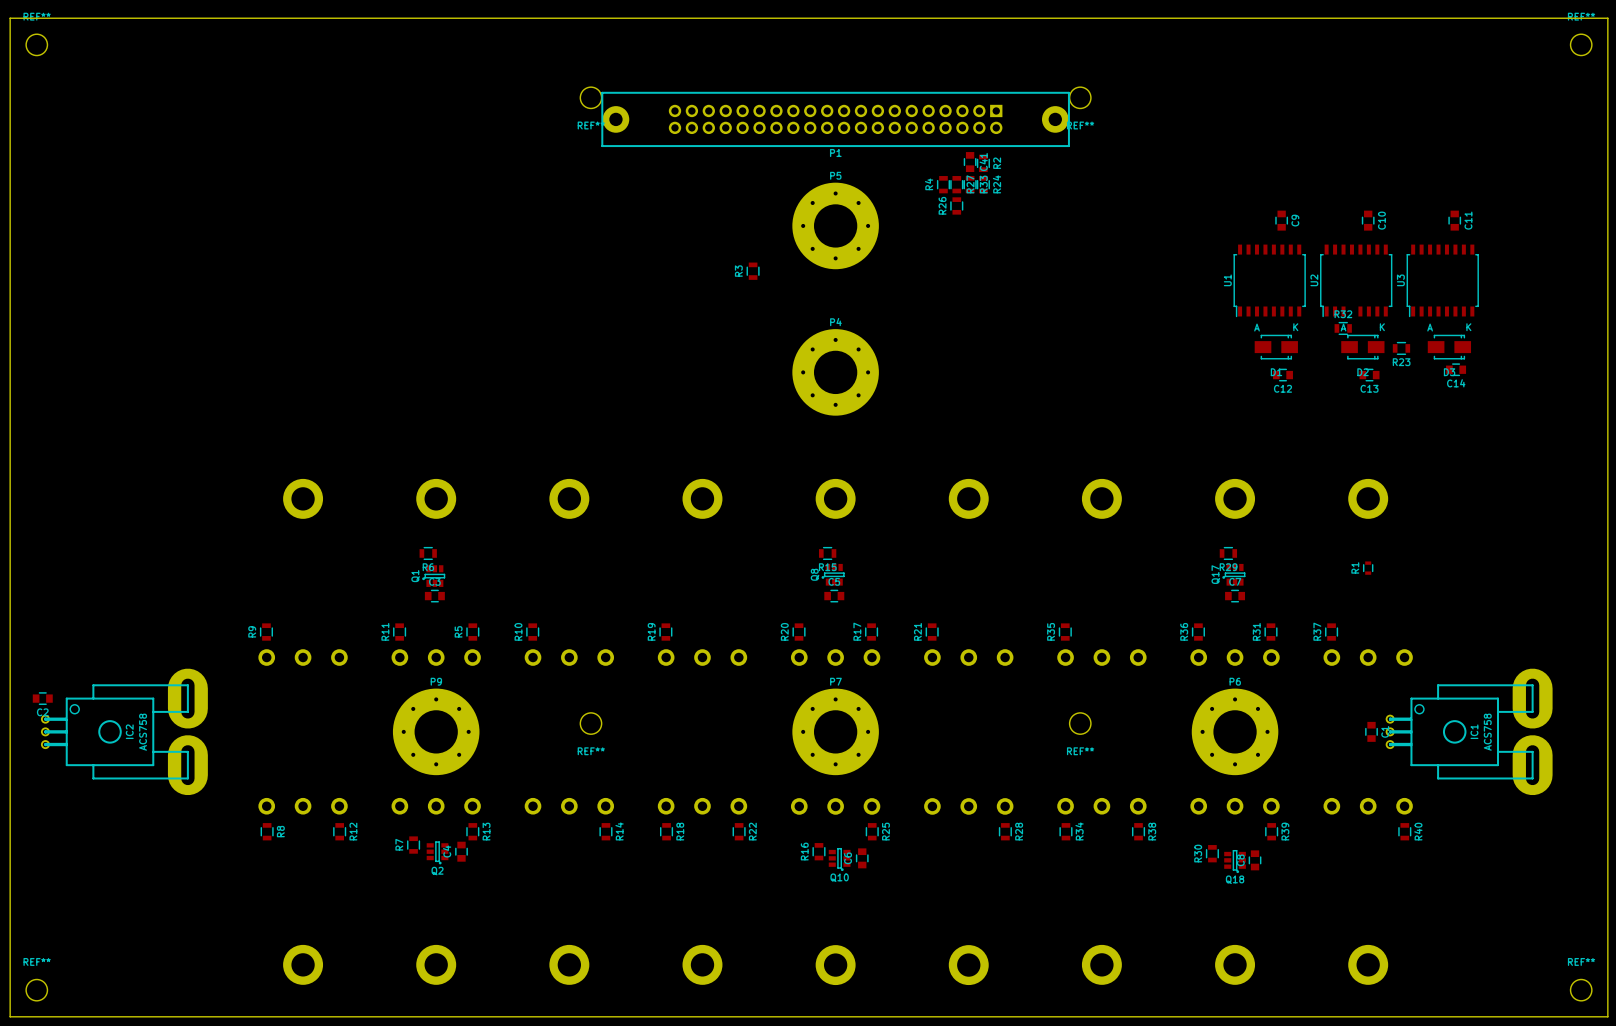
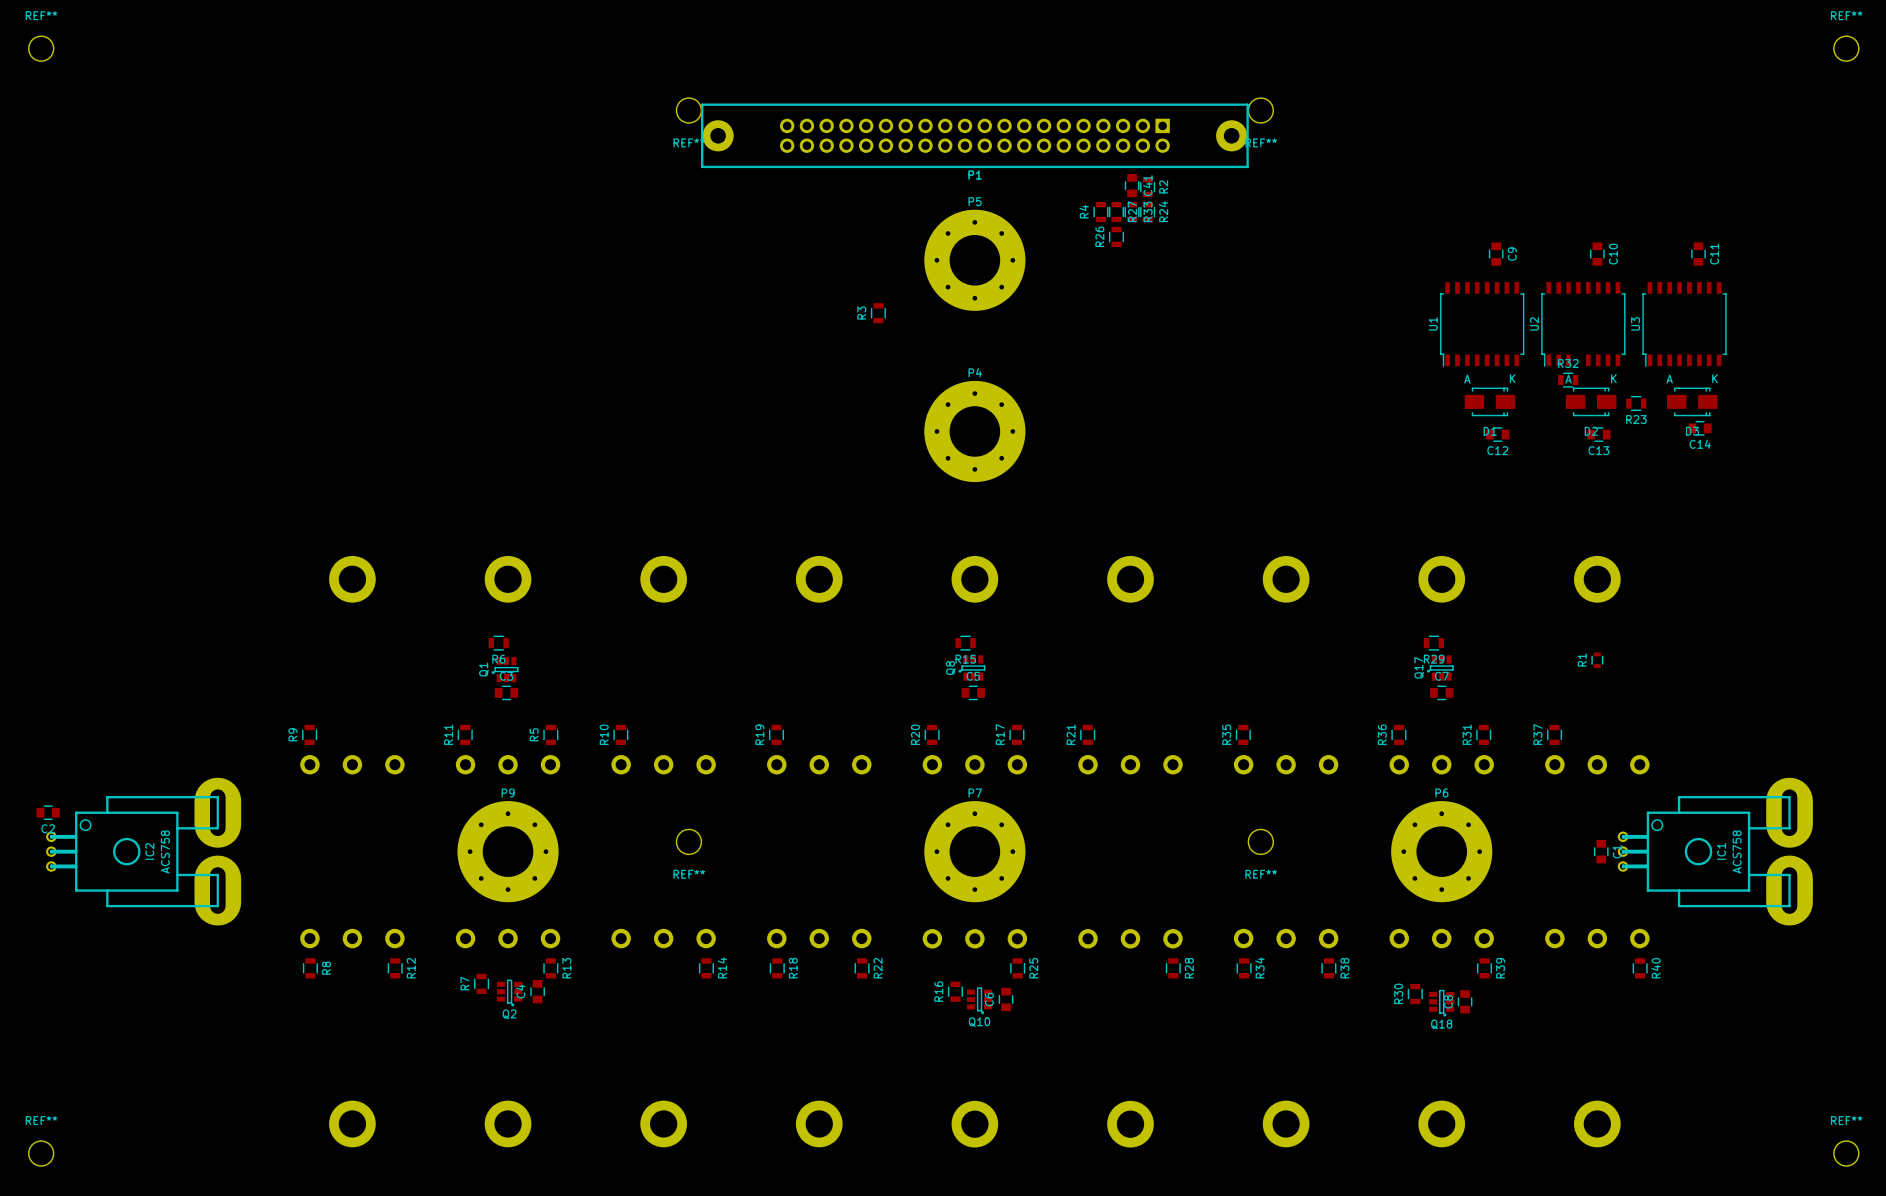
board edge: (10, 18) (10, 1016) (1607, 1016) (1607, 18) (10, 18) -> none

